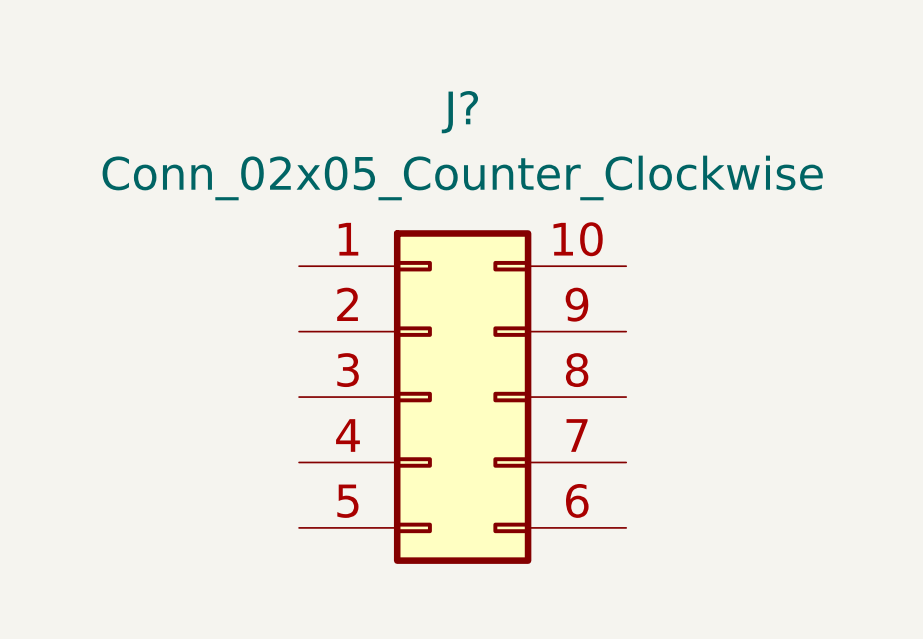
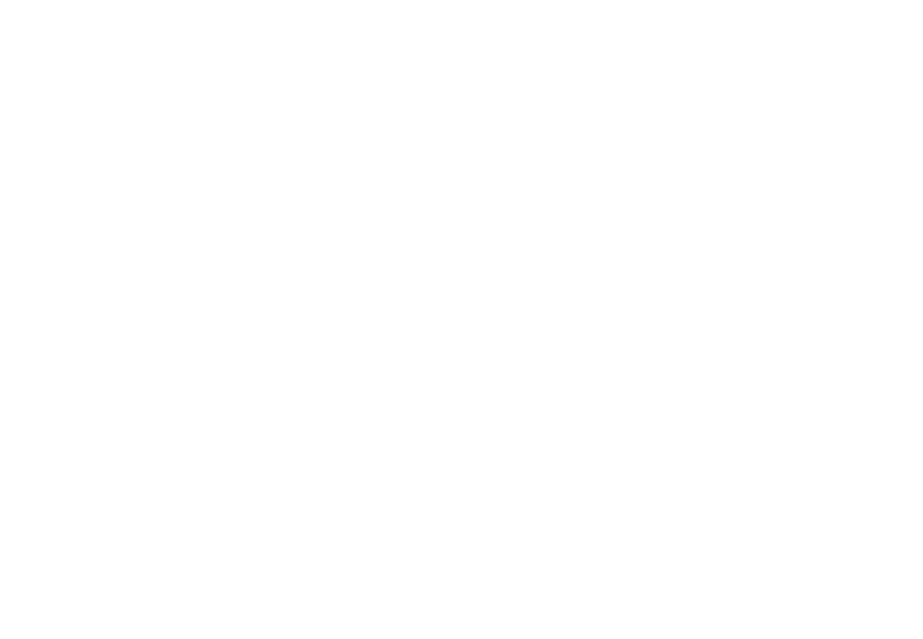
J?: Conn_02x05_Counter_Clockwise (462, 397) -> none

